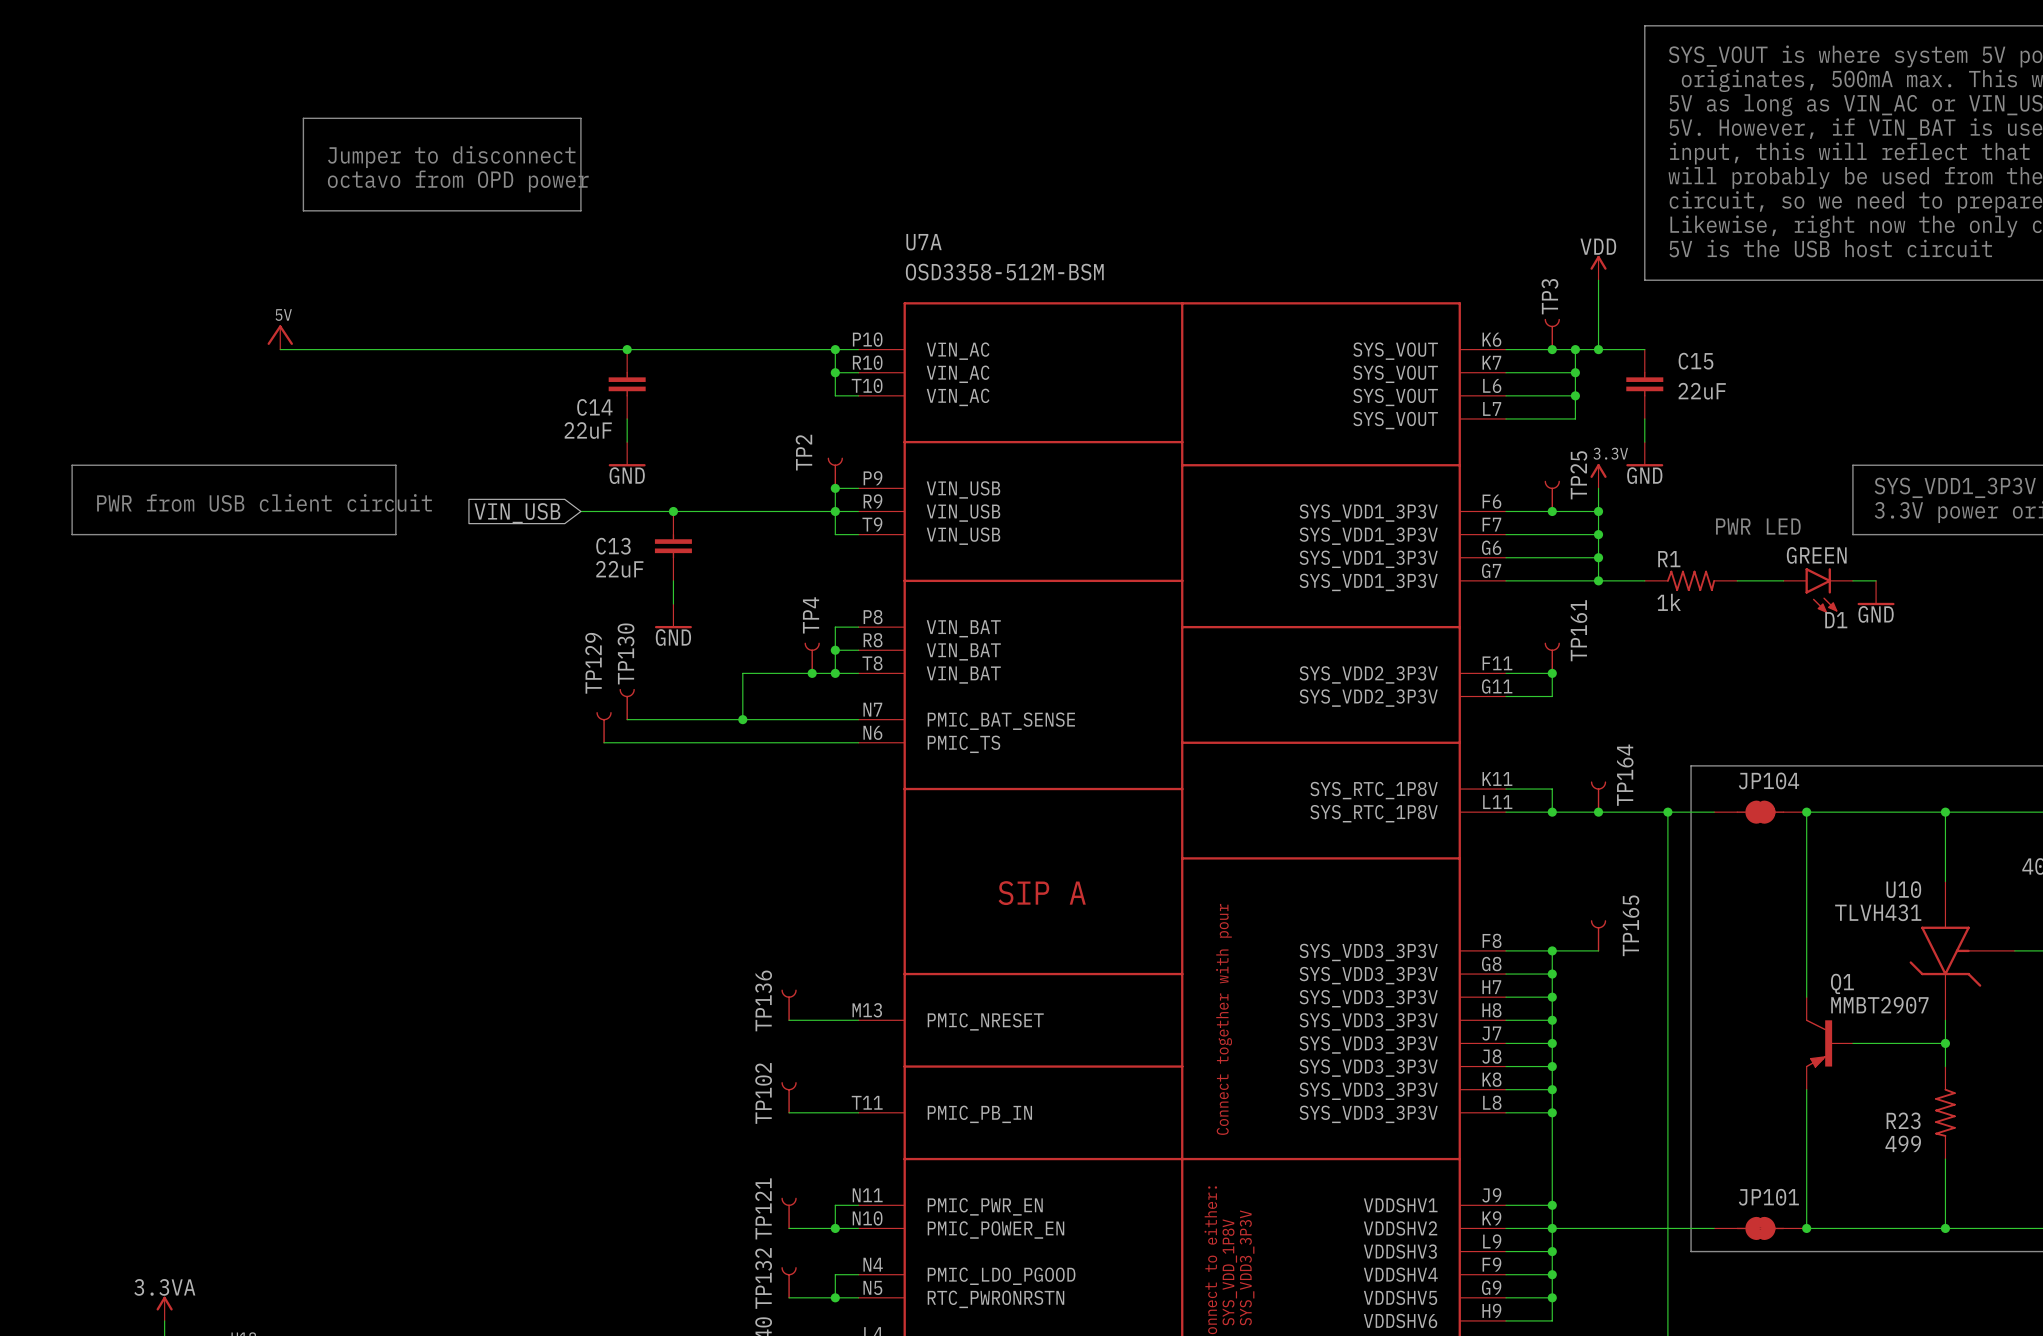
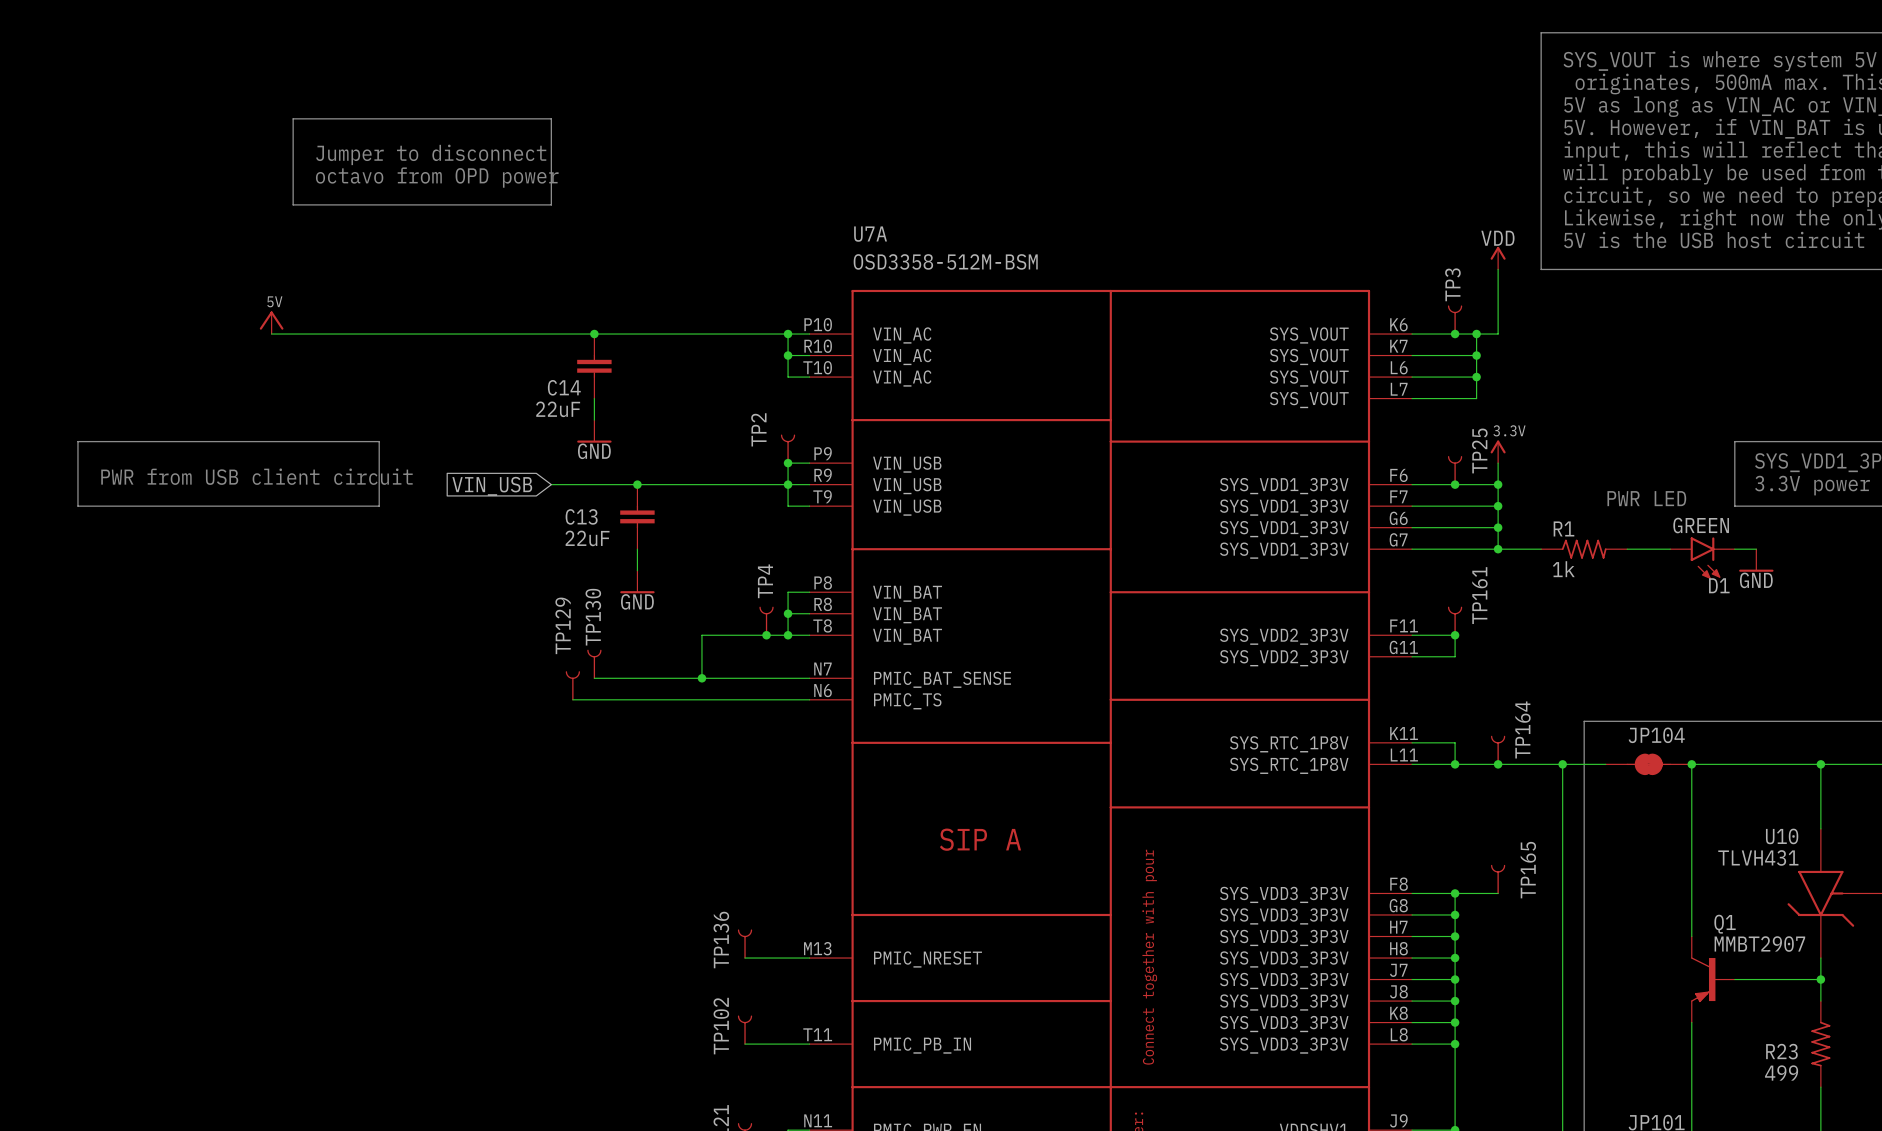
wire: (1598, 349) (1644, 349) -> none
junction: (1598, 349) -> none
C15: 22uF (1644, 384) -> none
wire: (1644, 418) (1644, 442) -> none
power symbol: GND (1644, 454) -> none

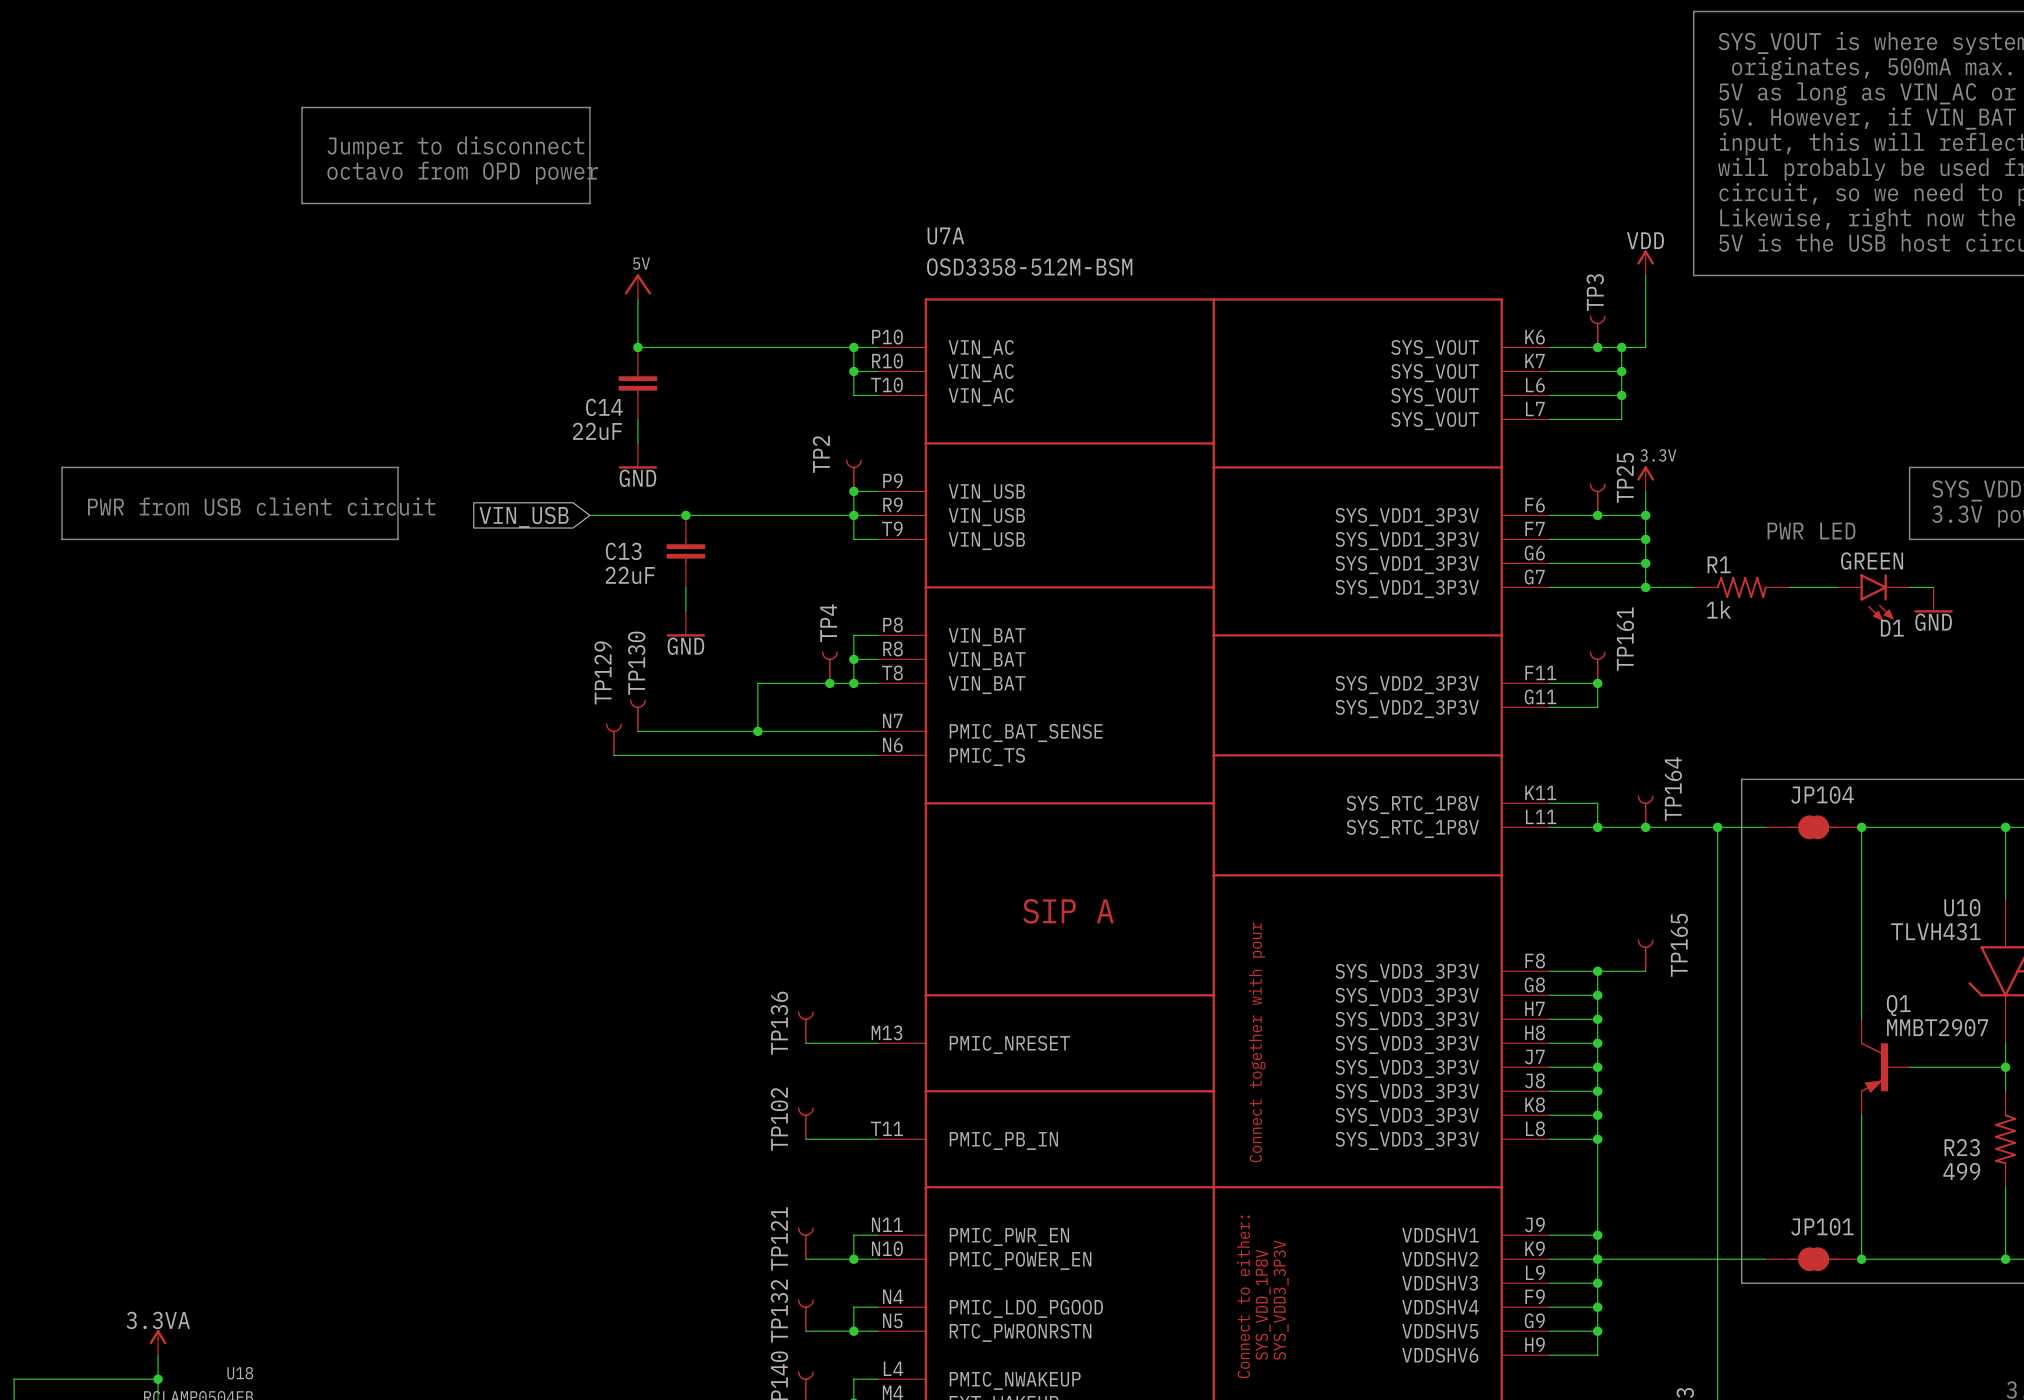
power symbol: none -> 5V (637, 286)
power symbol: 5V (271, 322) -> none
wire: (271, 334) (594, 334) -> (637, 299) (637, 347)

